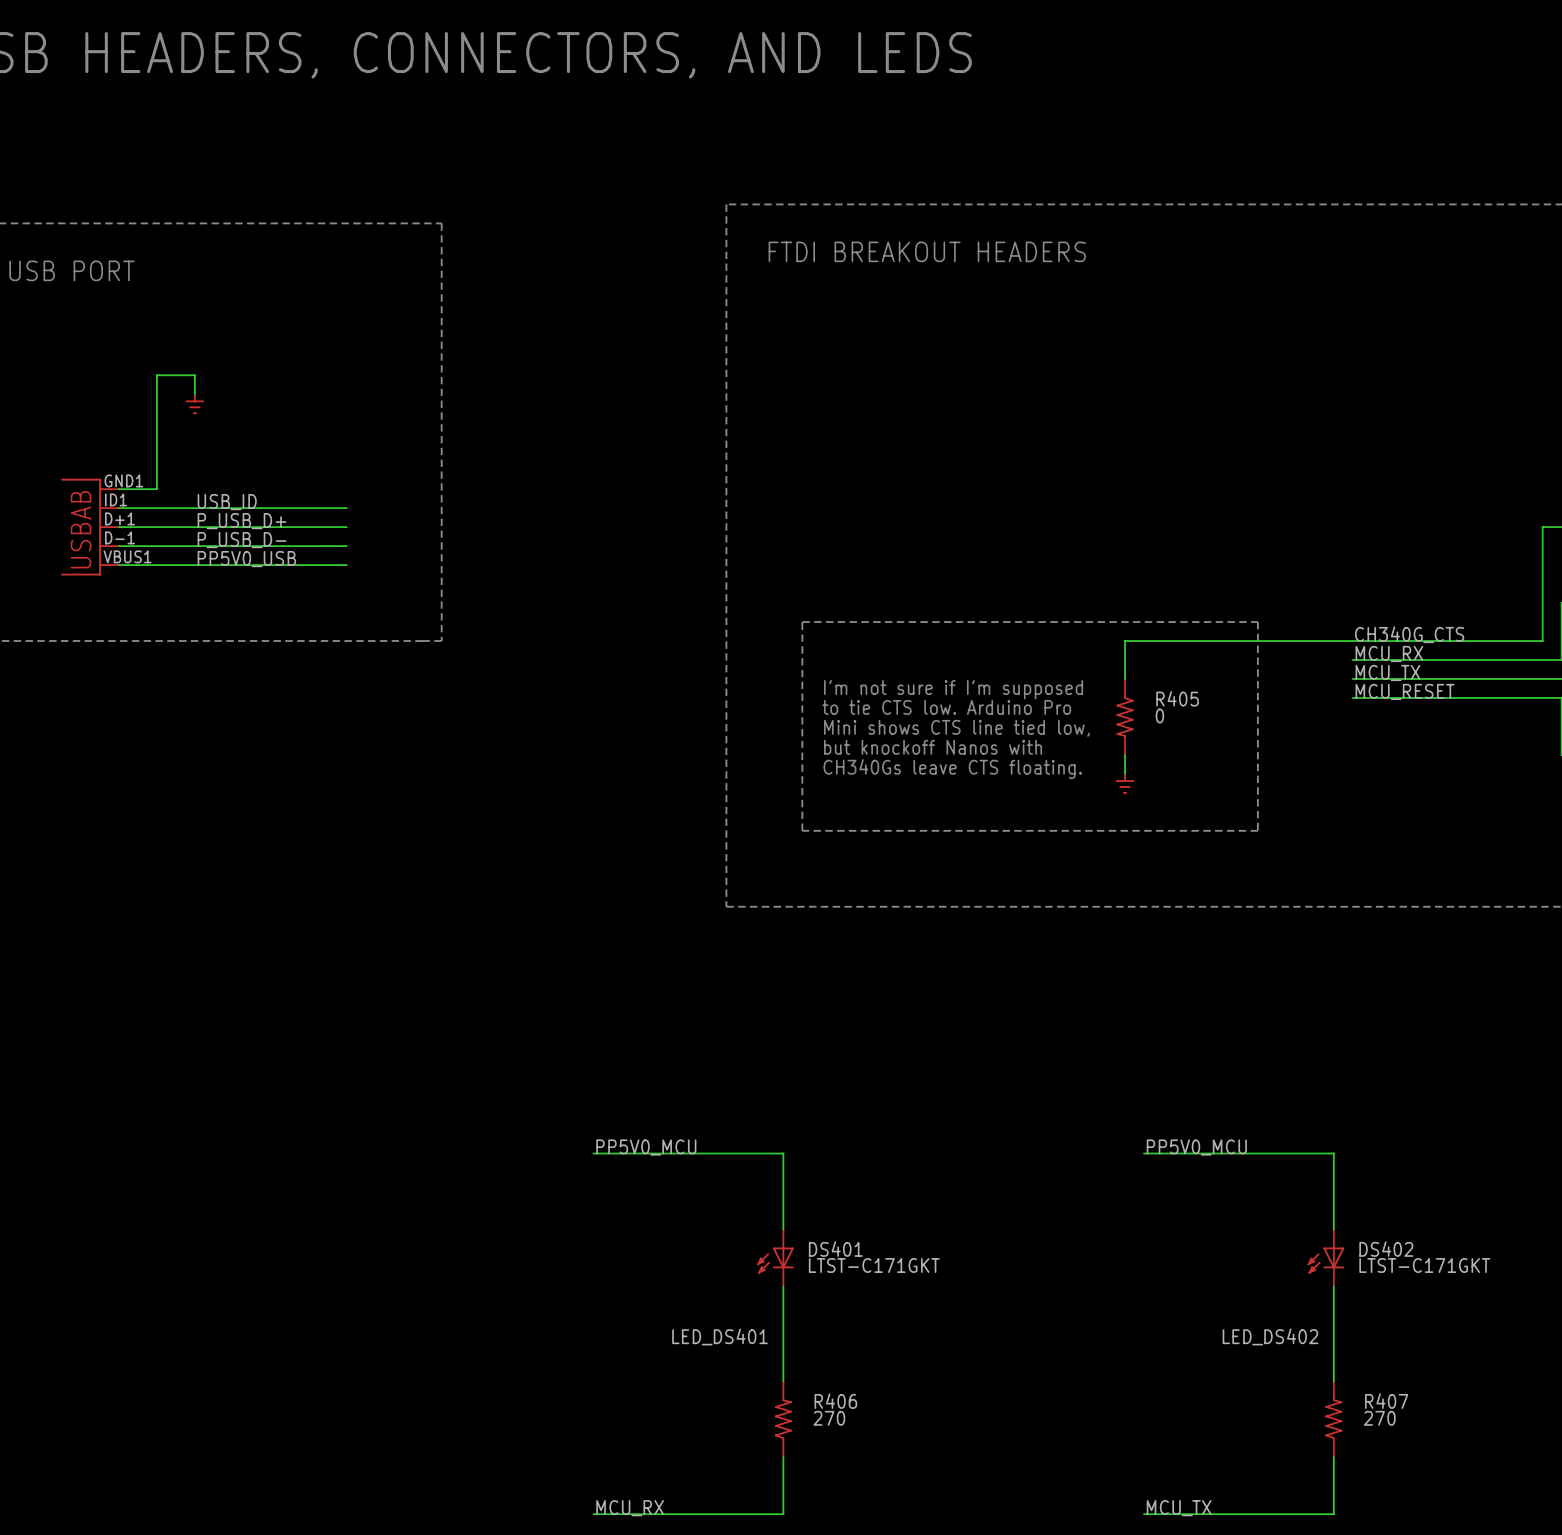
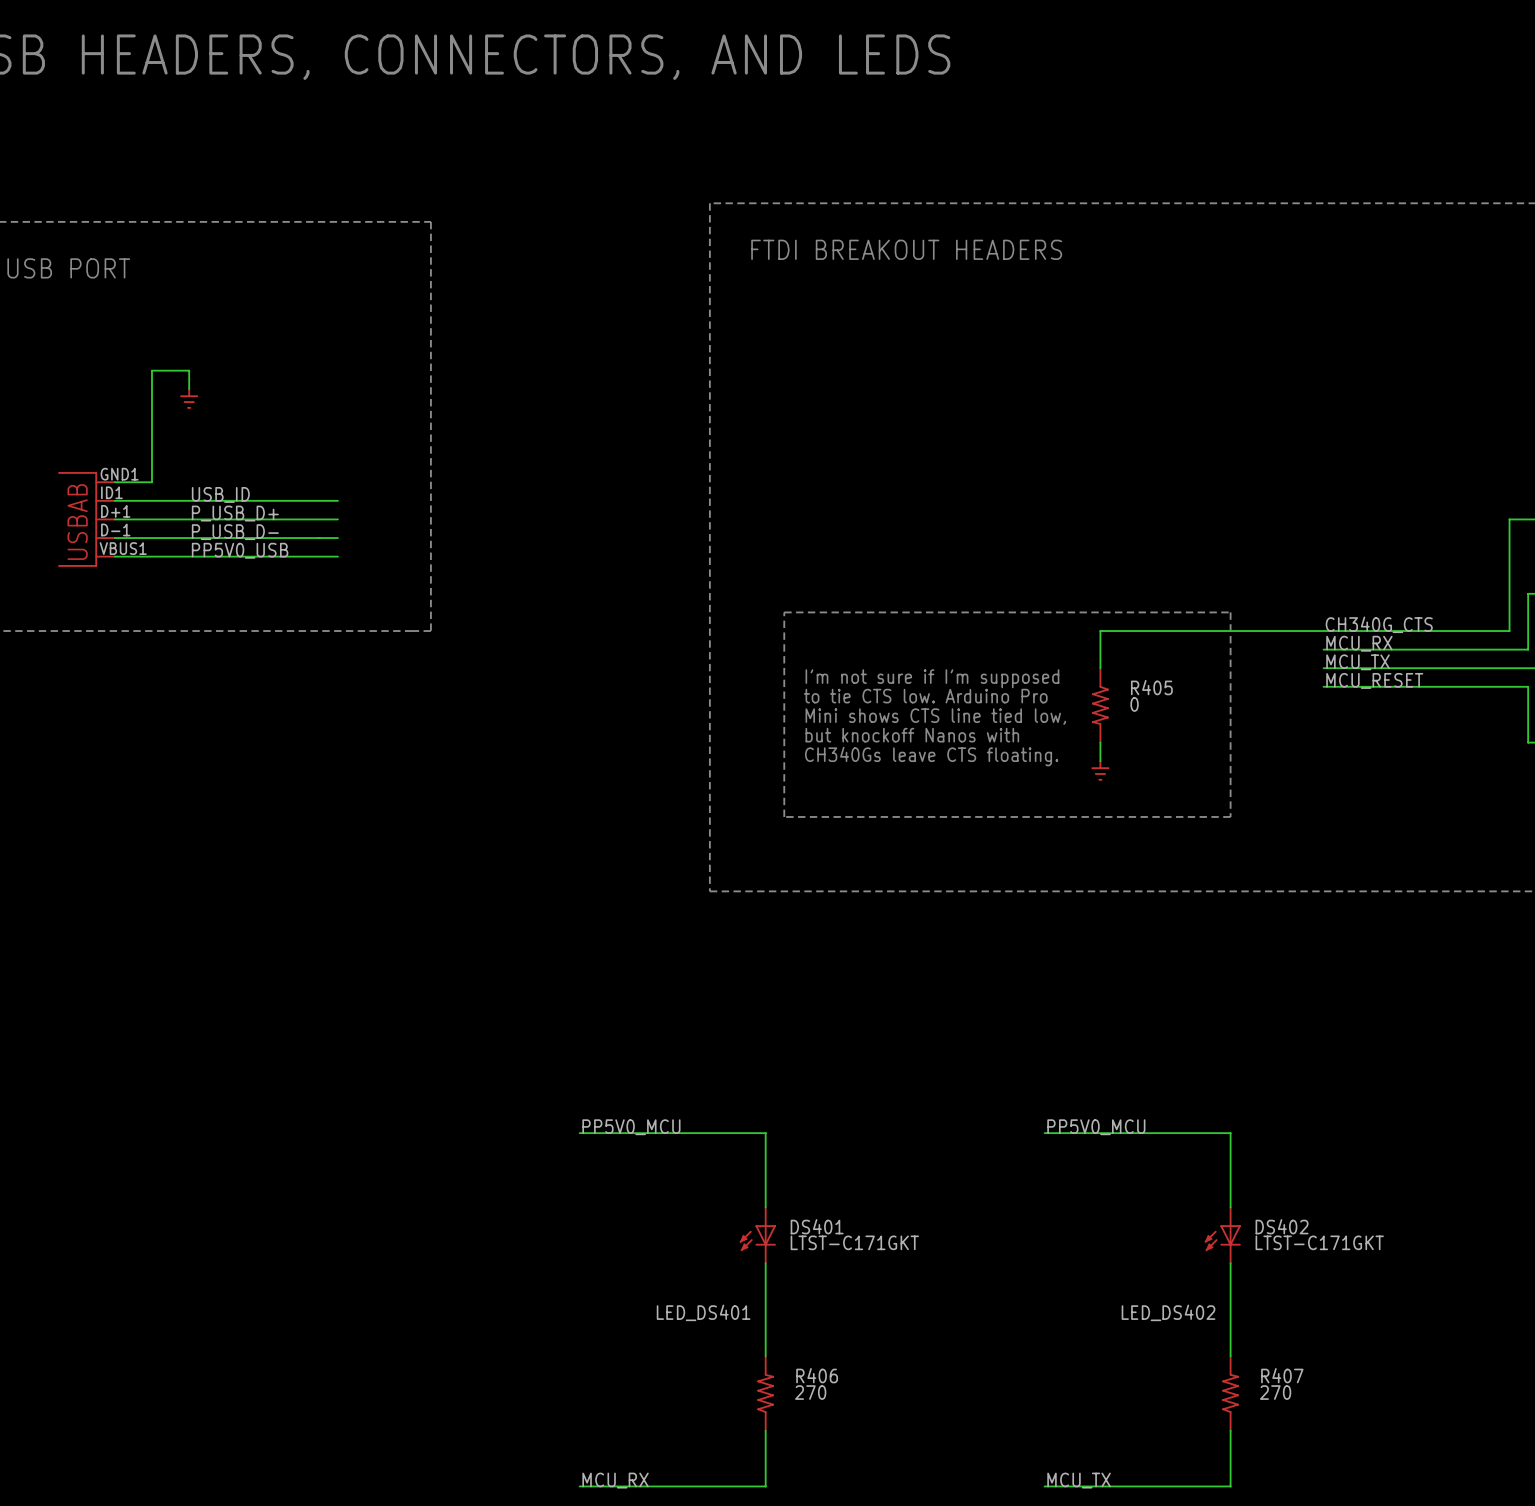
label position: PP5V0_MCU (1196, 1147) -> PP5V0_MCU (1096, 1127)
wire: none -> (1044, 1133) (1119, 1133)
wire: (1257, 1153) (1333, 1153) (1333, 1229) -> (1230, 1133) (1230, 1207)
DS402 position: (1325, 1257) -> (1222, 1235)
wire: (1333, 1286) (1333, 1381) -> (1230, 1263) (1230, 1356)
label position: LED_DS402 (1270, 1337) -> LED_DS402 (1168, 1312)
R407 position: (1333, 1419) -> (1230, 1393)
wire: (1333, 1457) (1333, 1514) (1257, 1514) -> (1230, 1430) (1230, 1486)
label position: MCU_TX (1179, 1508) -> MCU_TX (1079, 1480)
wire: none -> (1044, 1486) (1119, 1486)

